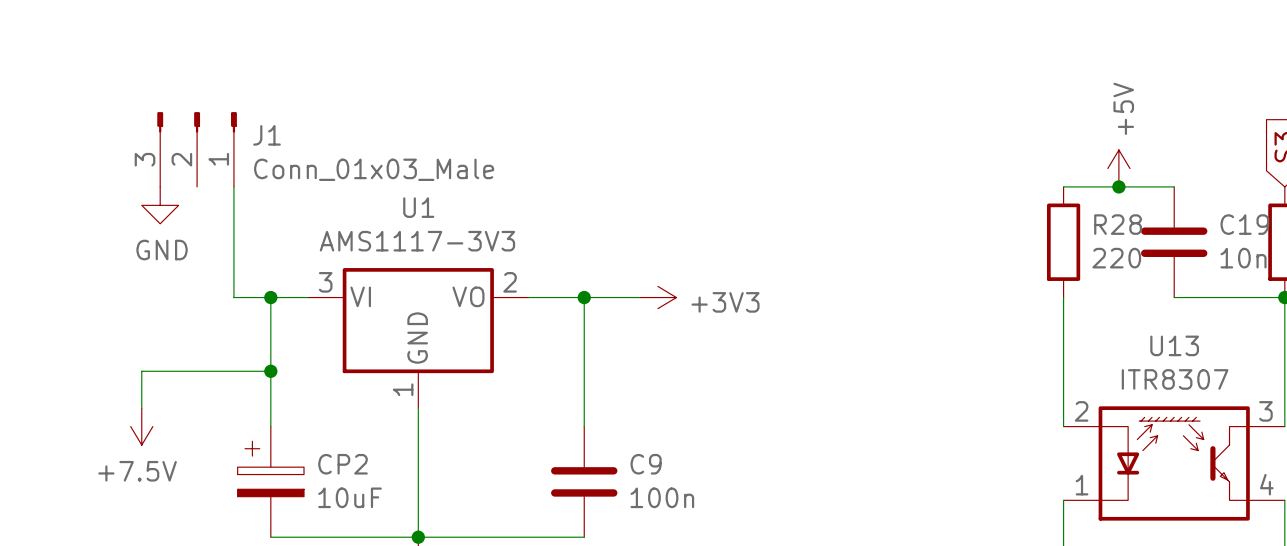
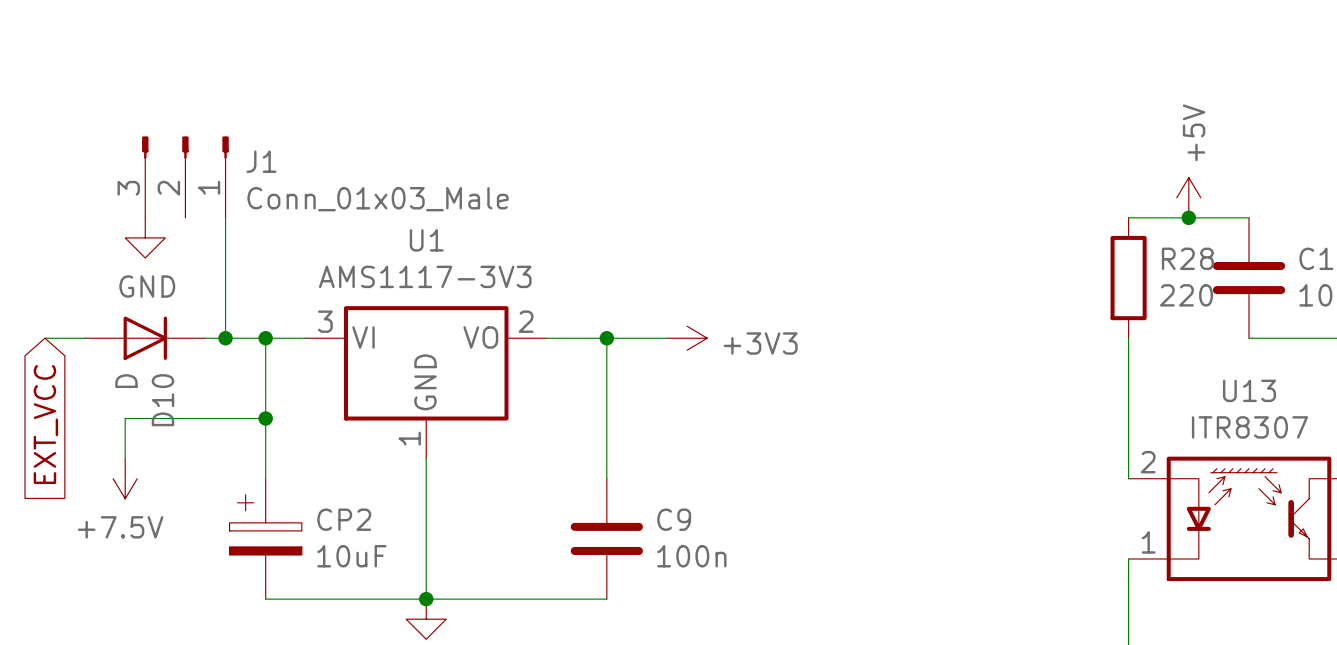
wire: none -> (44, 338) (85, 338)
D10: none -> D (145, 338)
wire: none -> (205, 338) (225, 338)
junction: none -> (225, 338)
global label: none -> EXT_VCC (45, 424)

